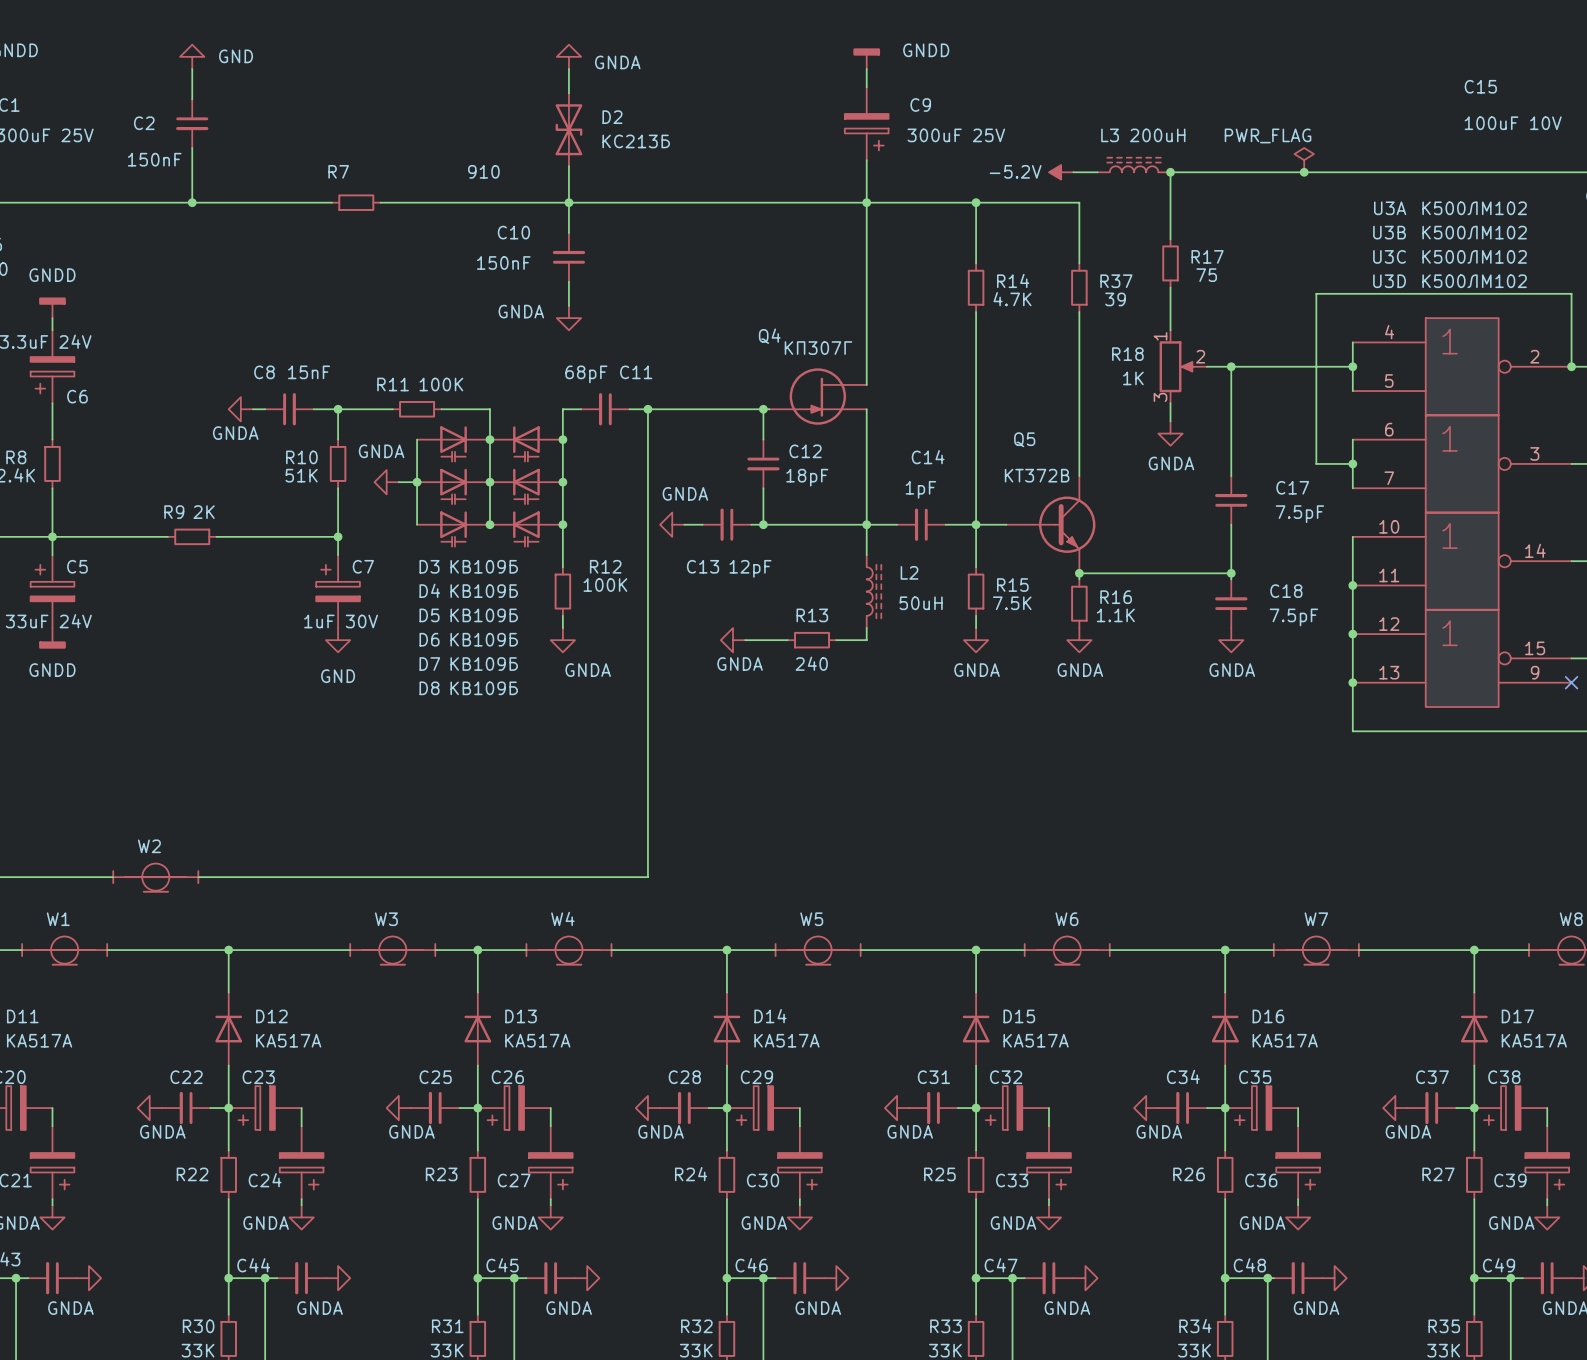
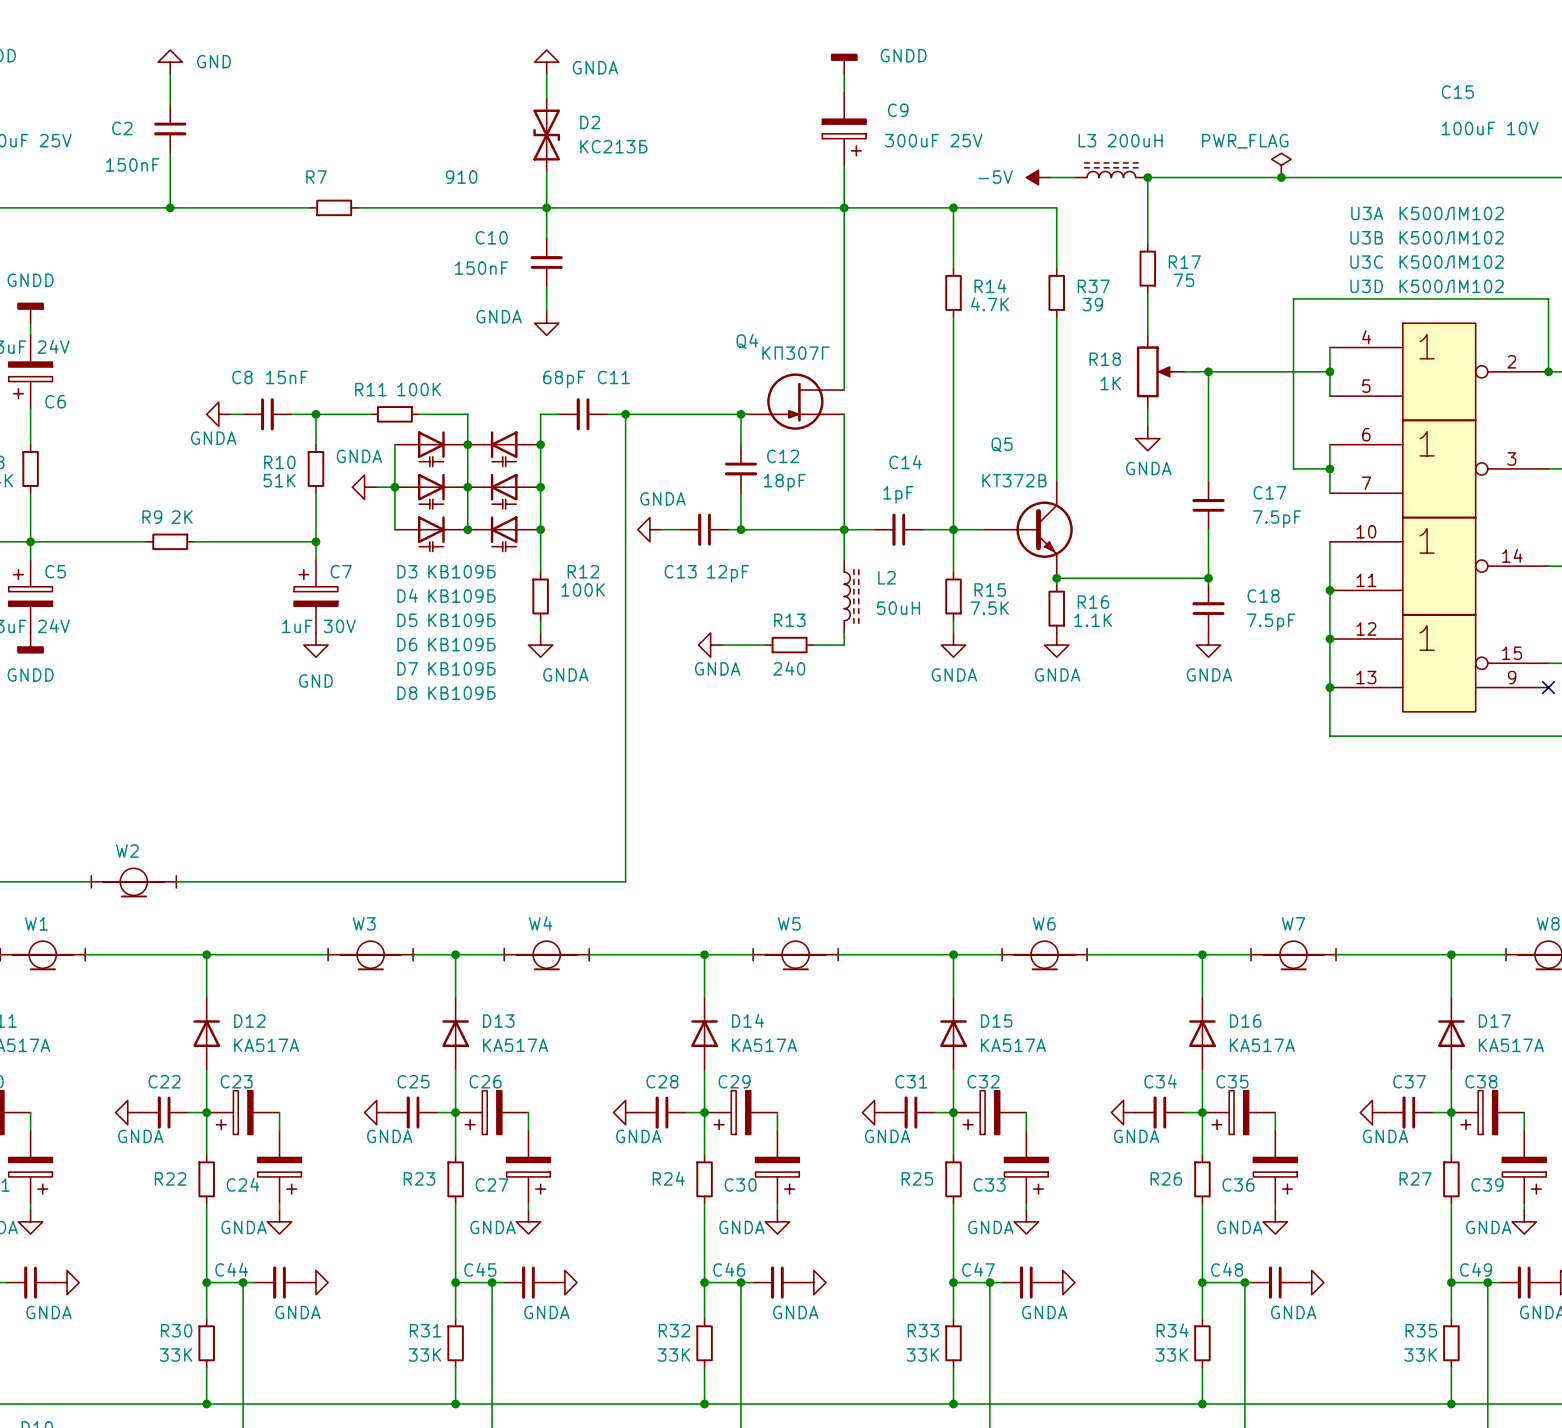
power symbol: -5.2V (1061, 172) -> -5V (1038, 177)
R18 pin number: 1 (1160, 336) -> none
R18 pin number: 2 (1200, 356) -> none
R18 pin number: 3 (1160, 397) -> none

